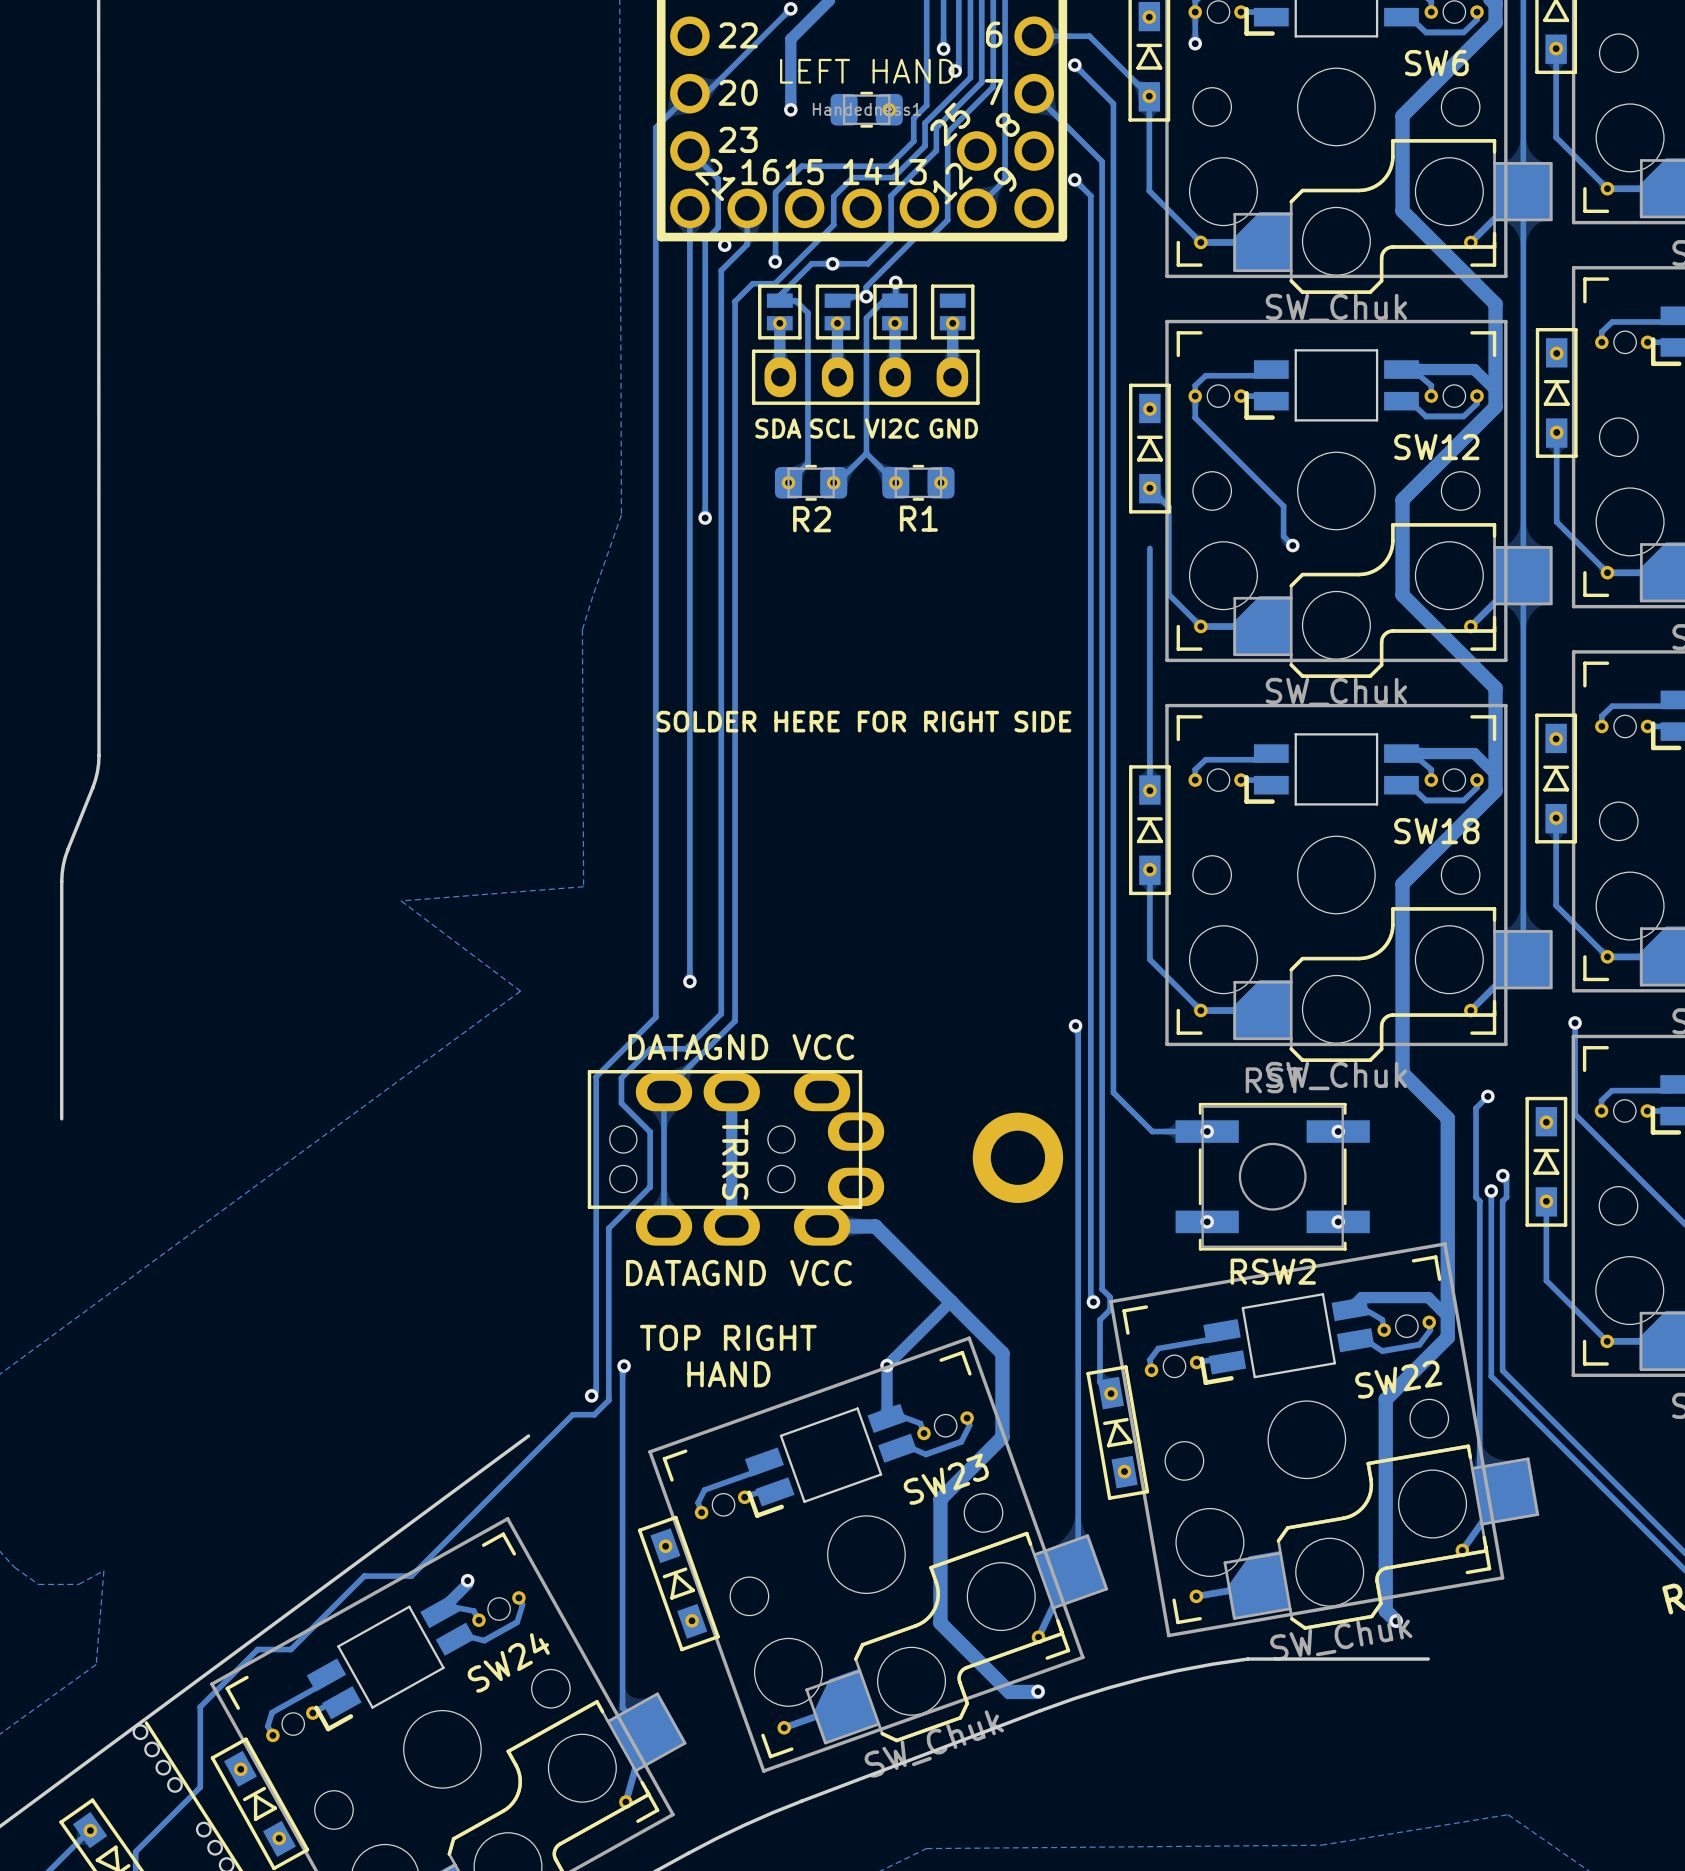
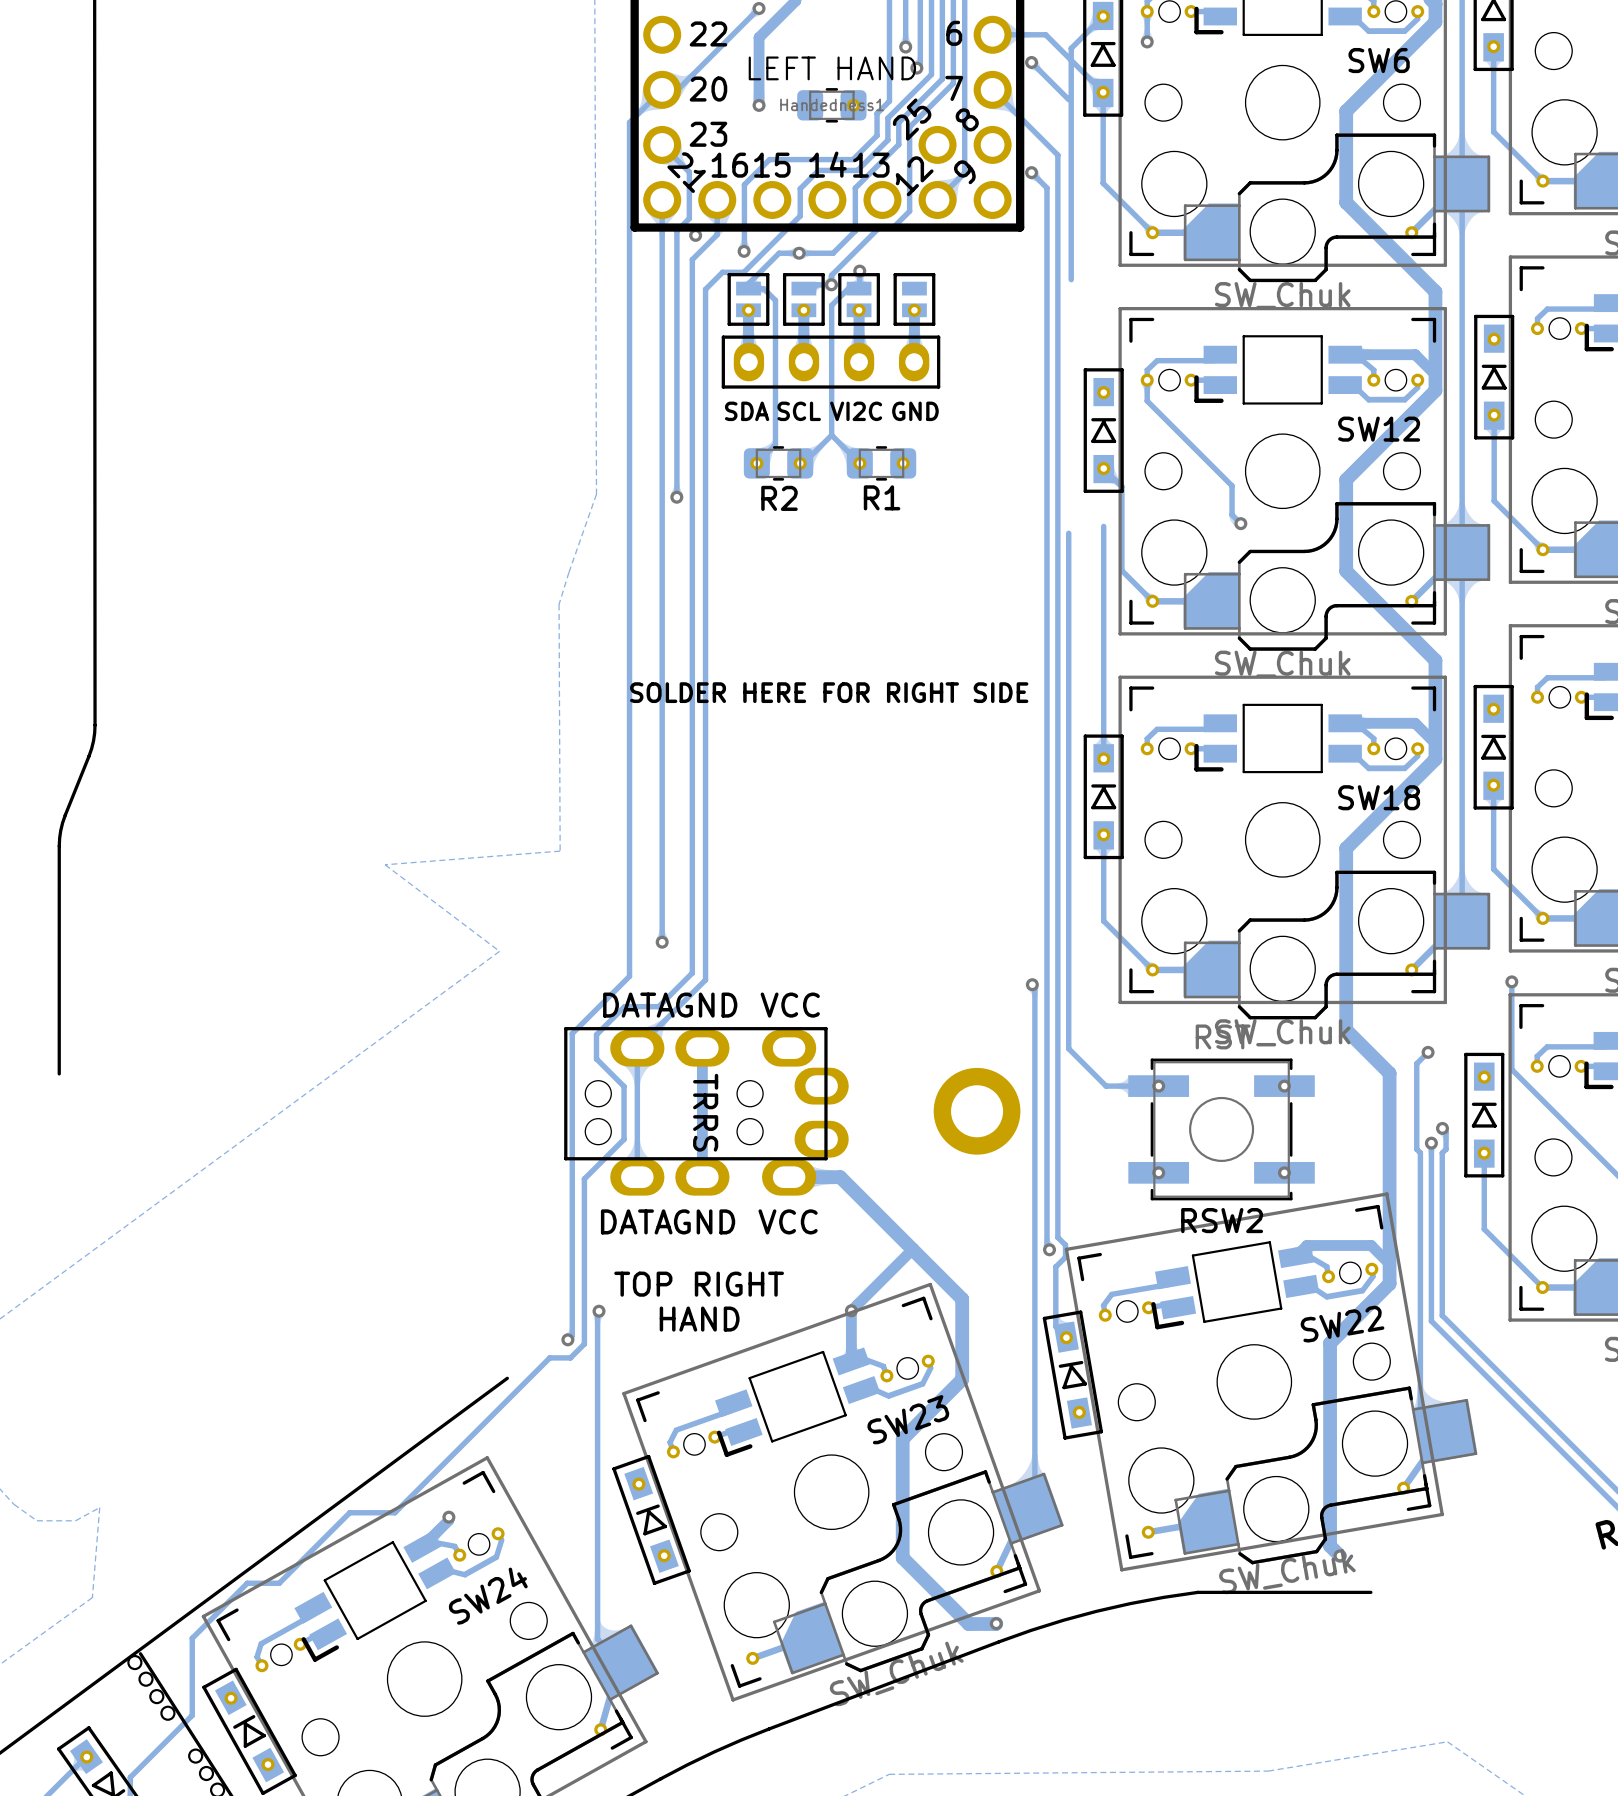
track: none -> (1103, 16) (1071, 48) (1071, 279)
track: (1113, 103) (1113, 555) -> none

